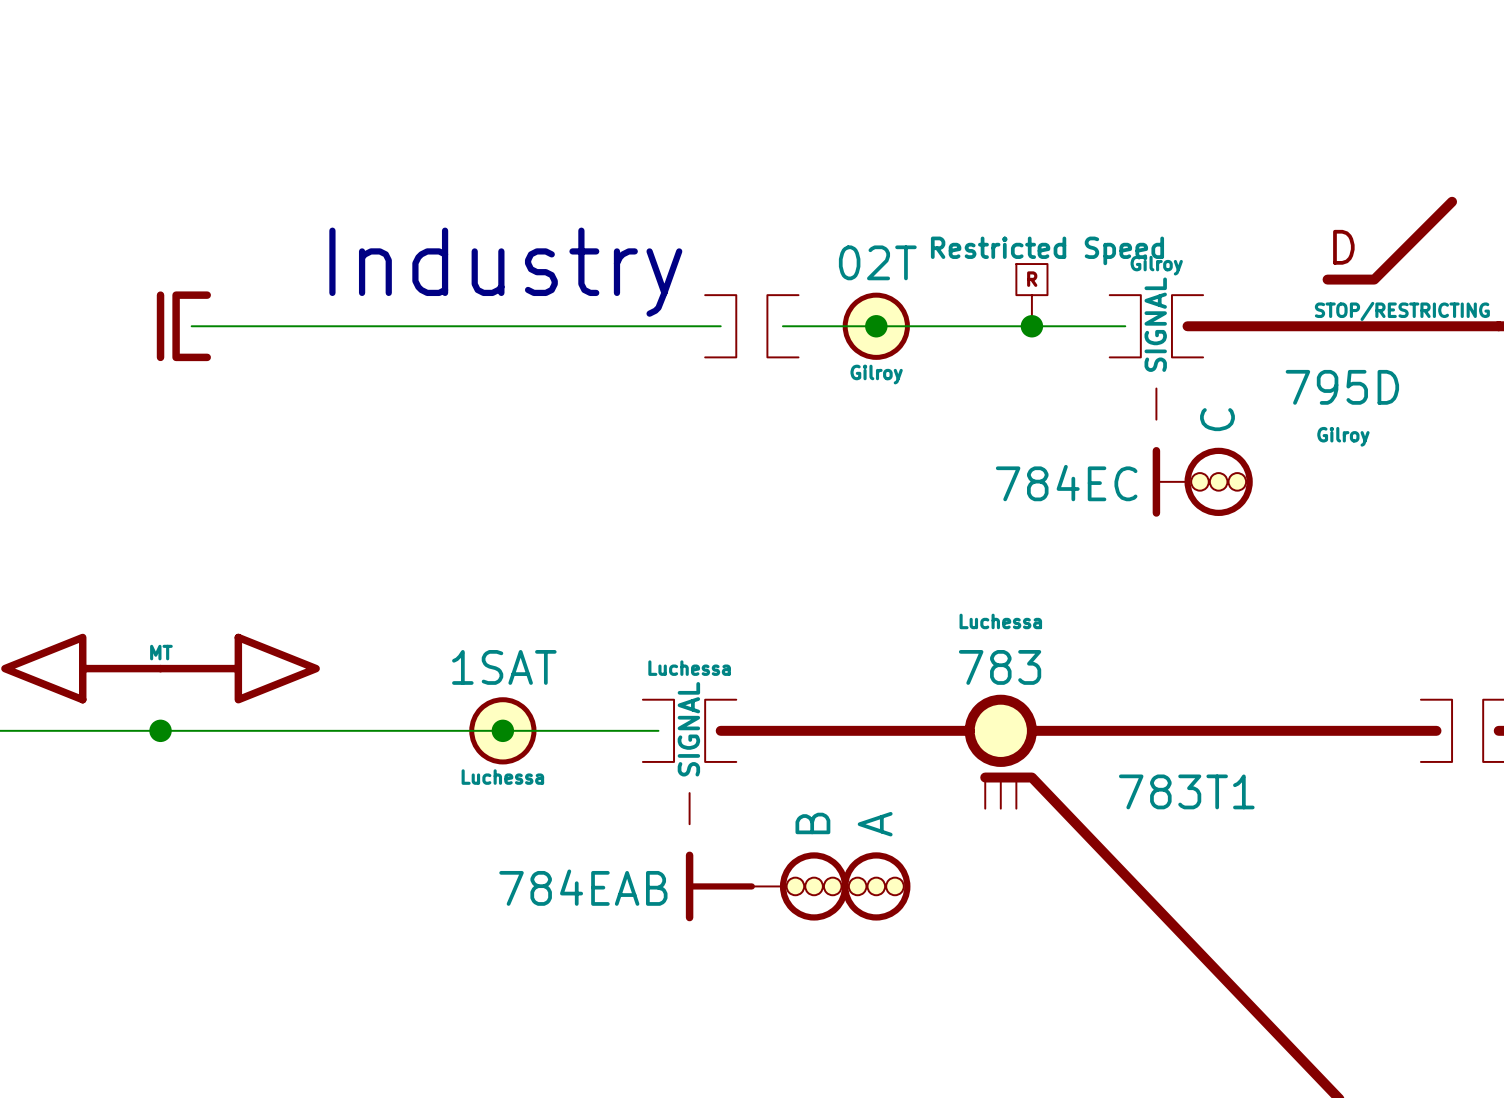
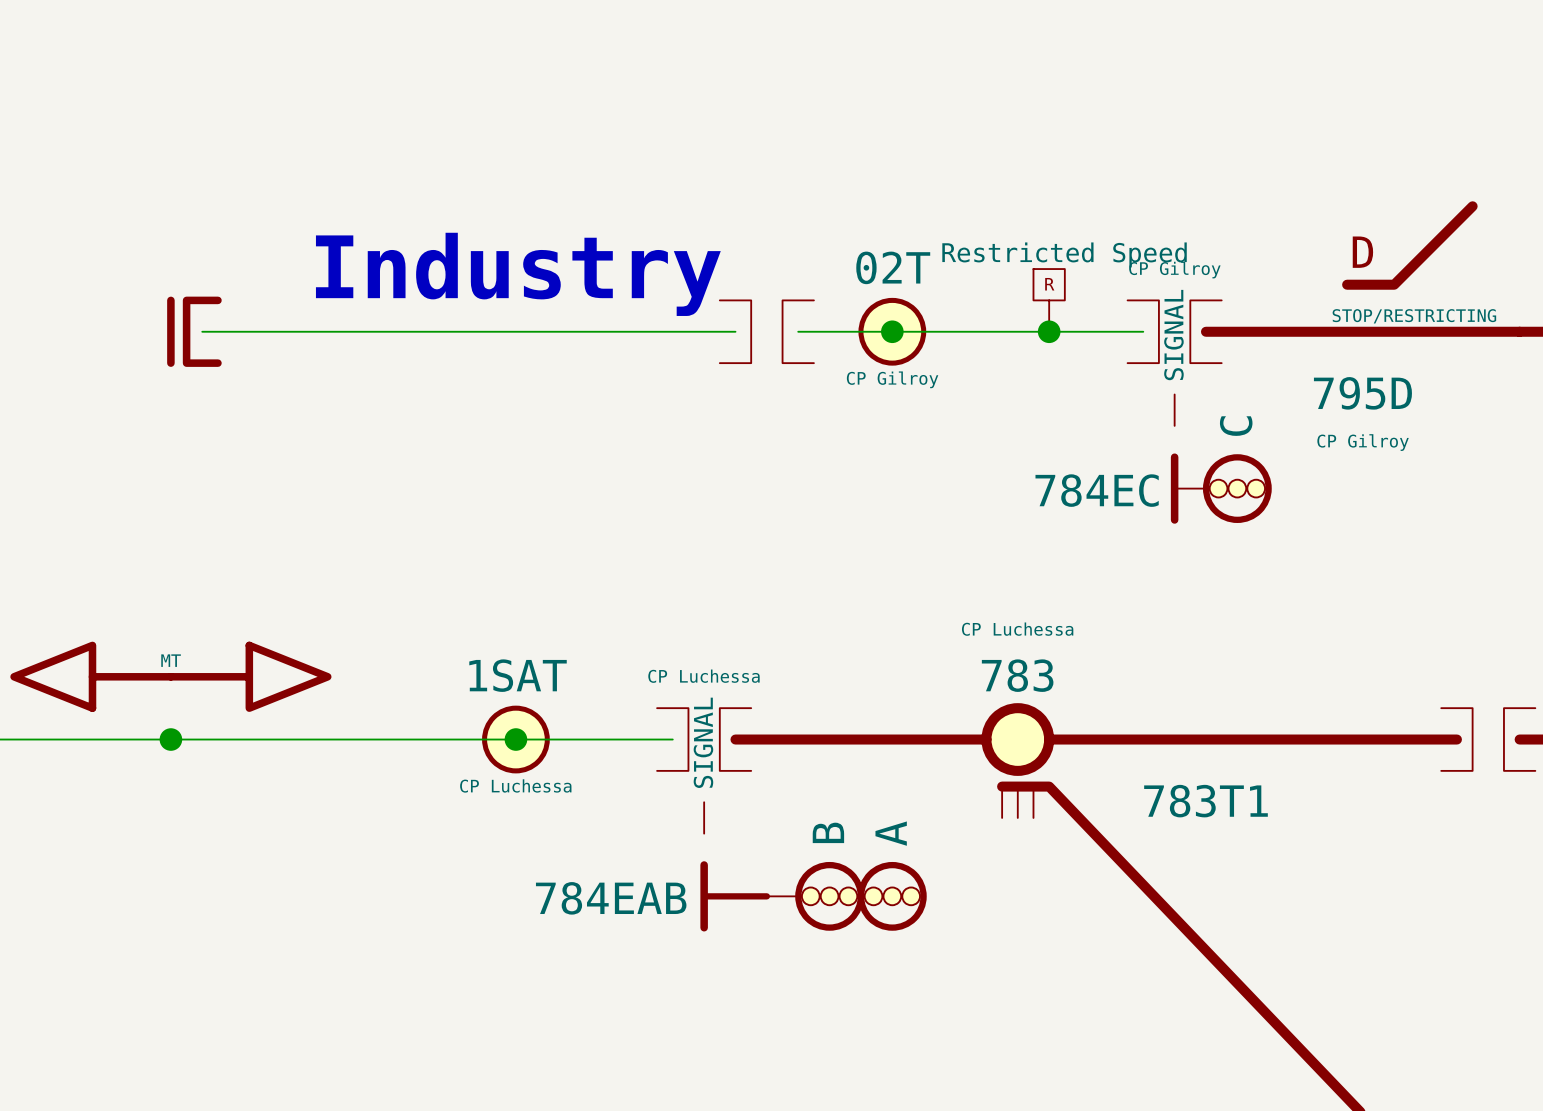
part text: Gilroy (1156, 265) -> CP Gilroy (1174, 270)
part text: Gilroy (876, 374) -> CP Gilroy (892, 379)
part text: Gilroy (1343, 436) -> CP Gilroy (1363, 442)
part text: Luchessa (1000, 621) -> CP Luchessa (1017, 629)
part text: Luchessa (689, 668) -> CP Luchessa (703, 676)
part text: Luchessa (502, 777) -> CP Luchessa (515, 785)

